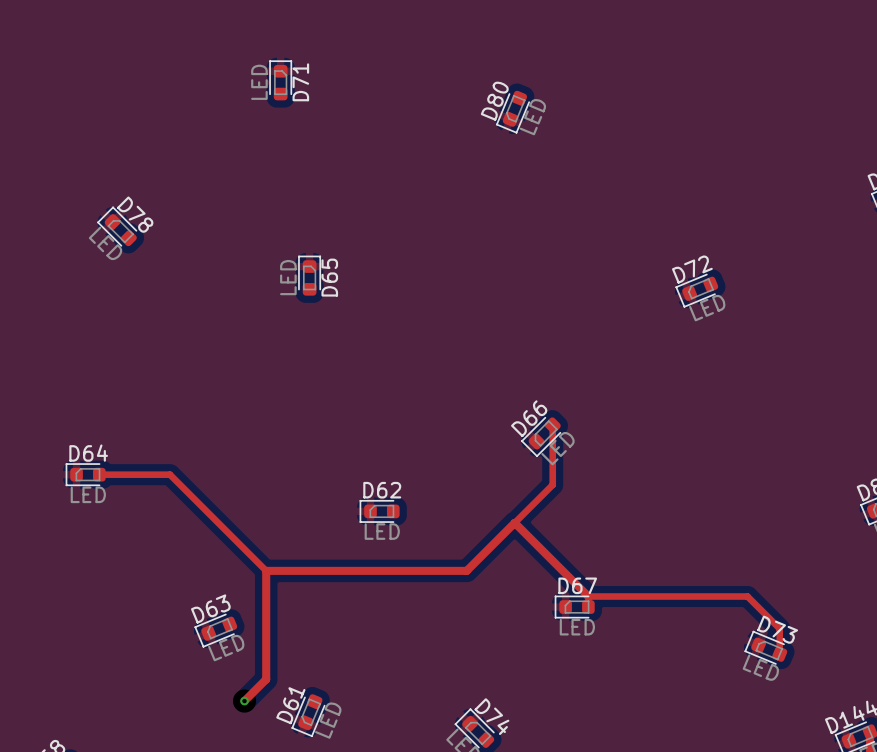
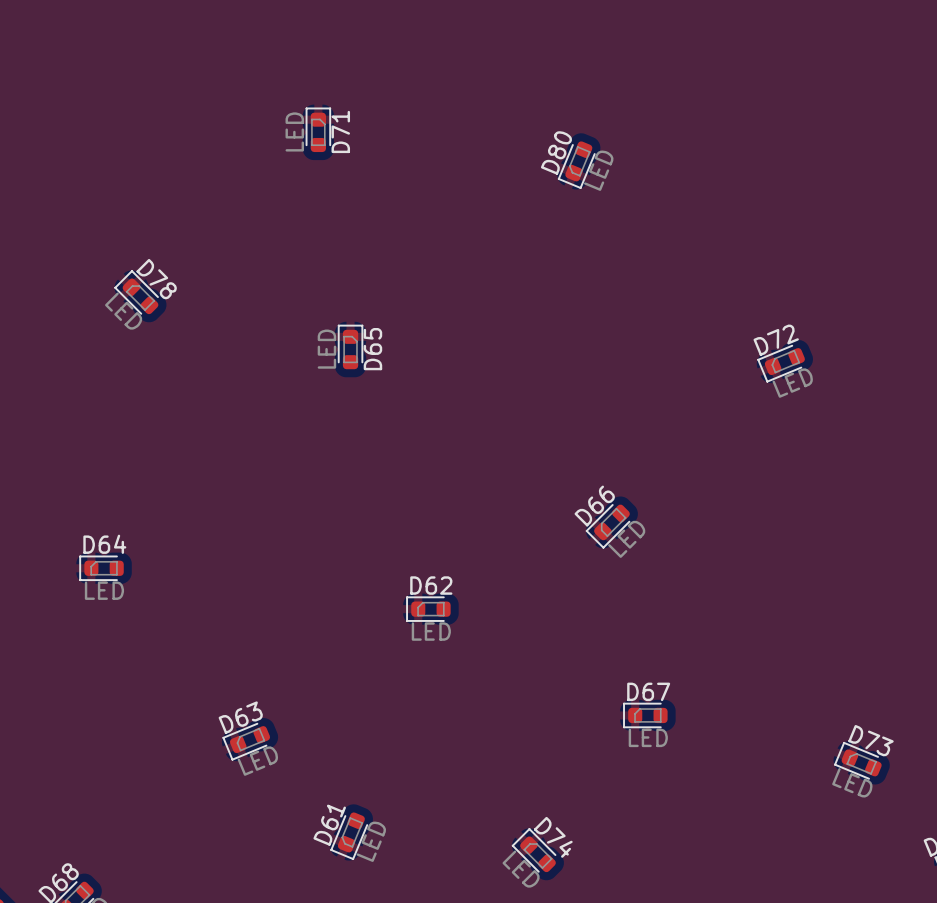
top track: (552, 425) (552, 484) (514, 522) -> none
top track: (99, 474) (170, 474) (266, 570) -> none
top track: (514, 522) (588, 596) -> none
top track: (514, 522) (466, 570) (266, 570) -> none
top track: (266, 570) (266, 679) (244, 701) -> none
top track: (588, 596) (747, 596) (779, 628) (779, 654) -> none
via: (244, 701) -> none

